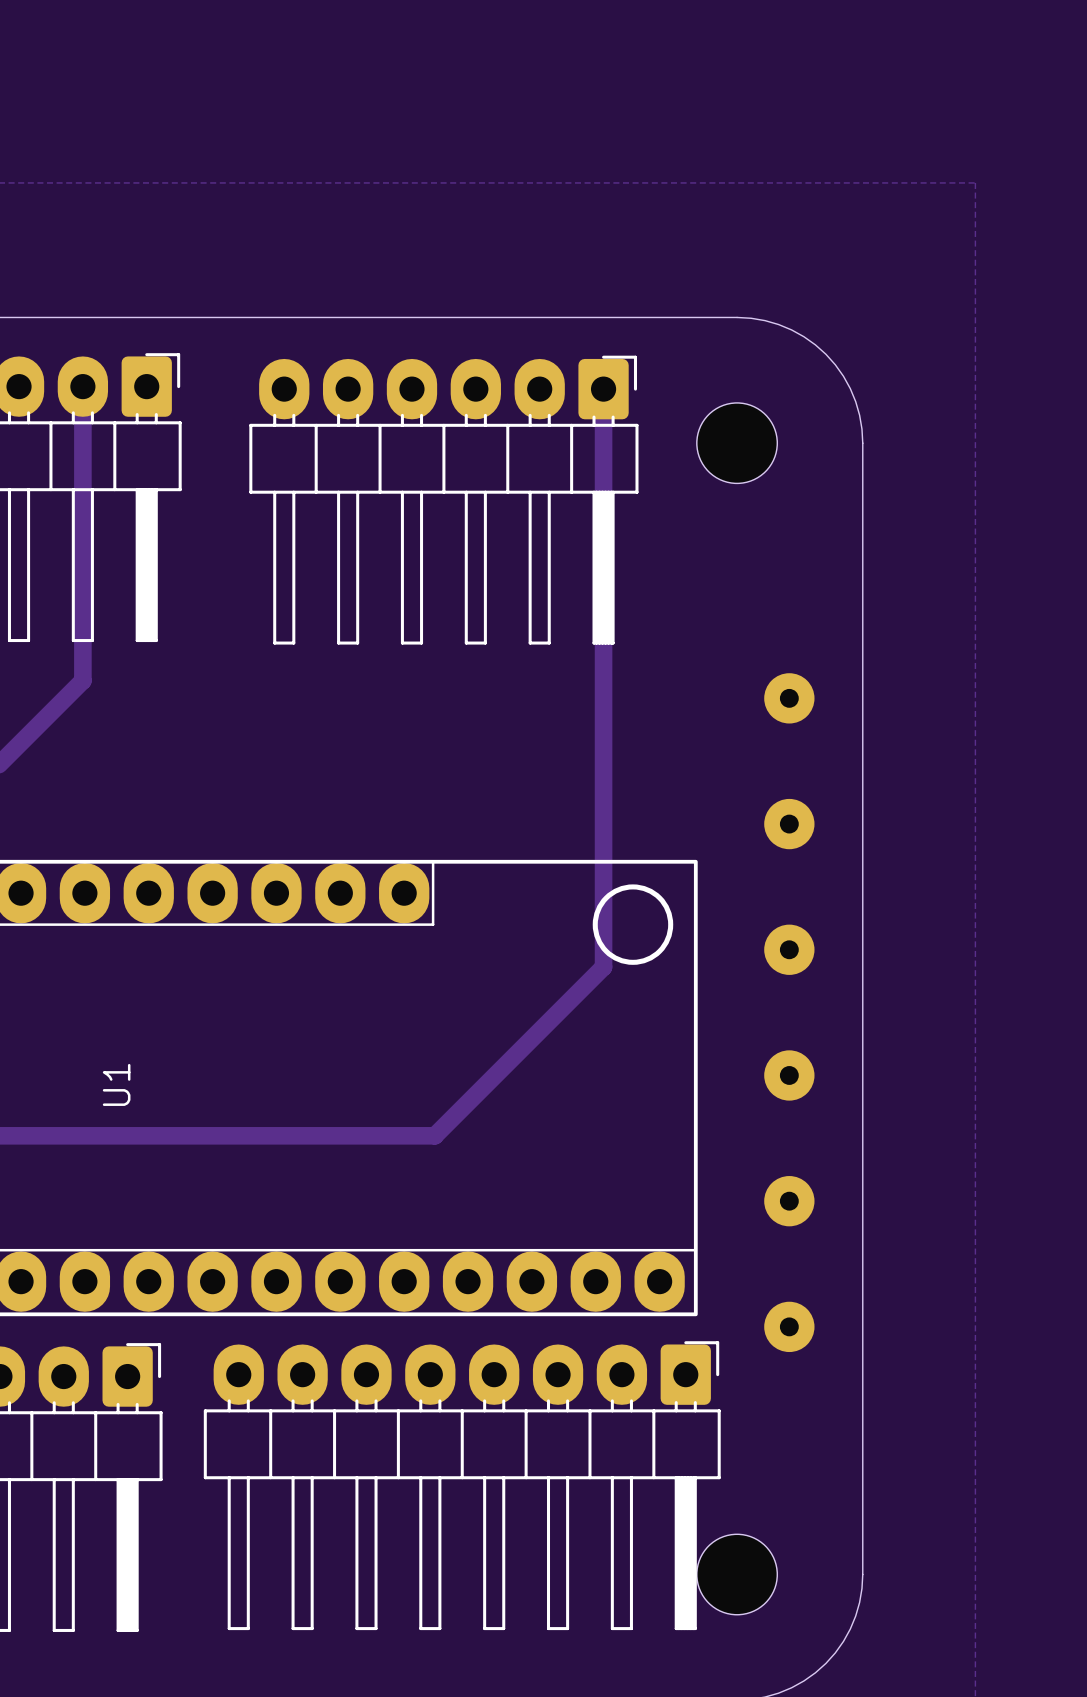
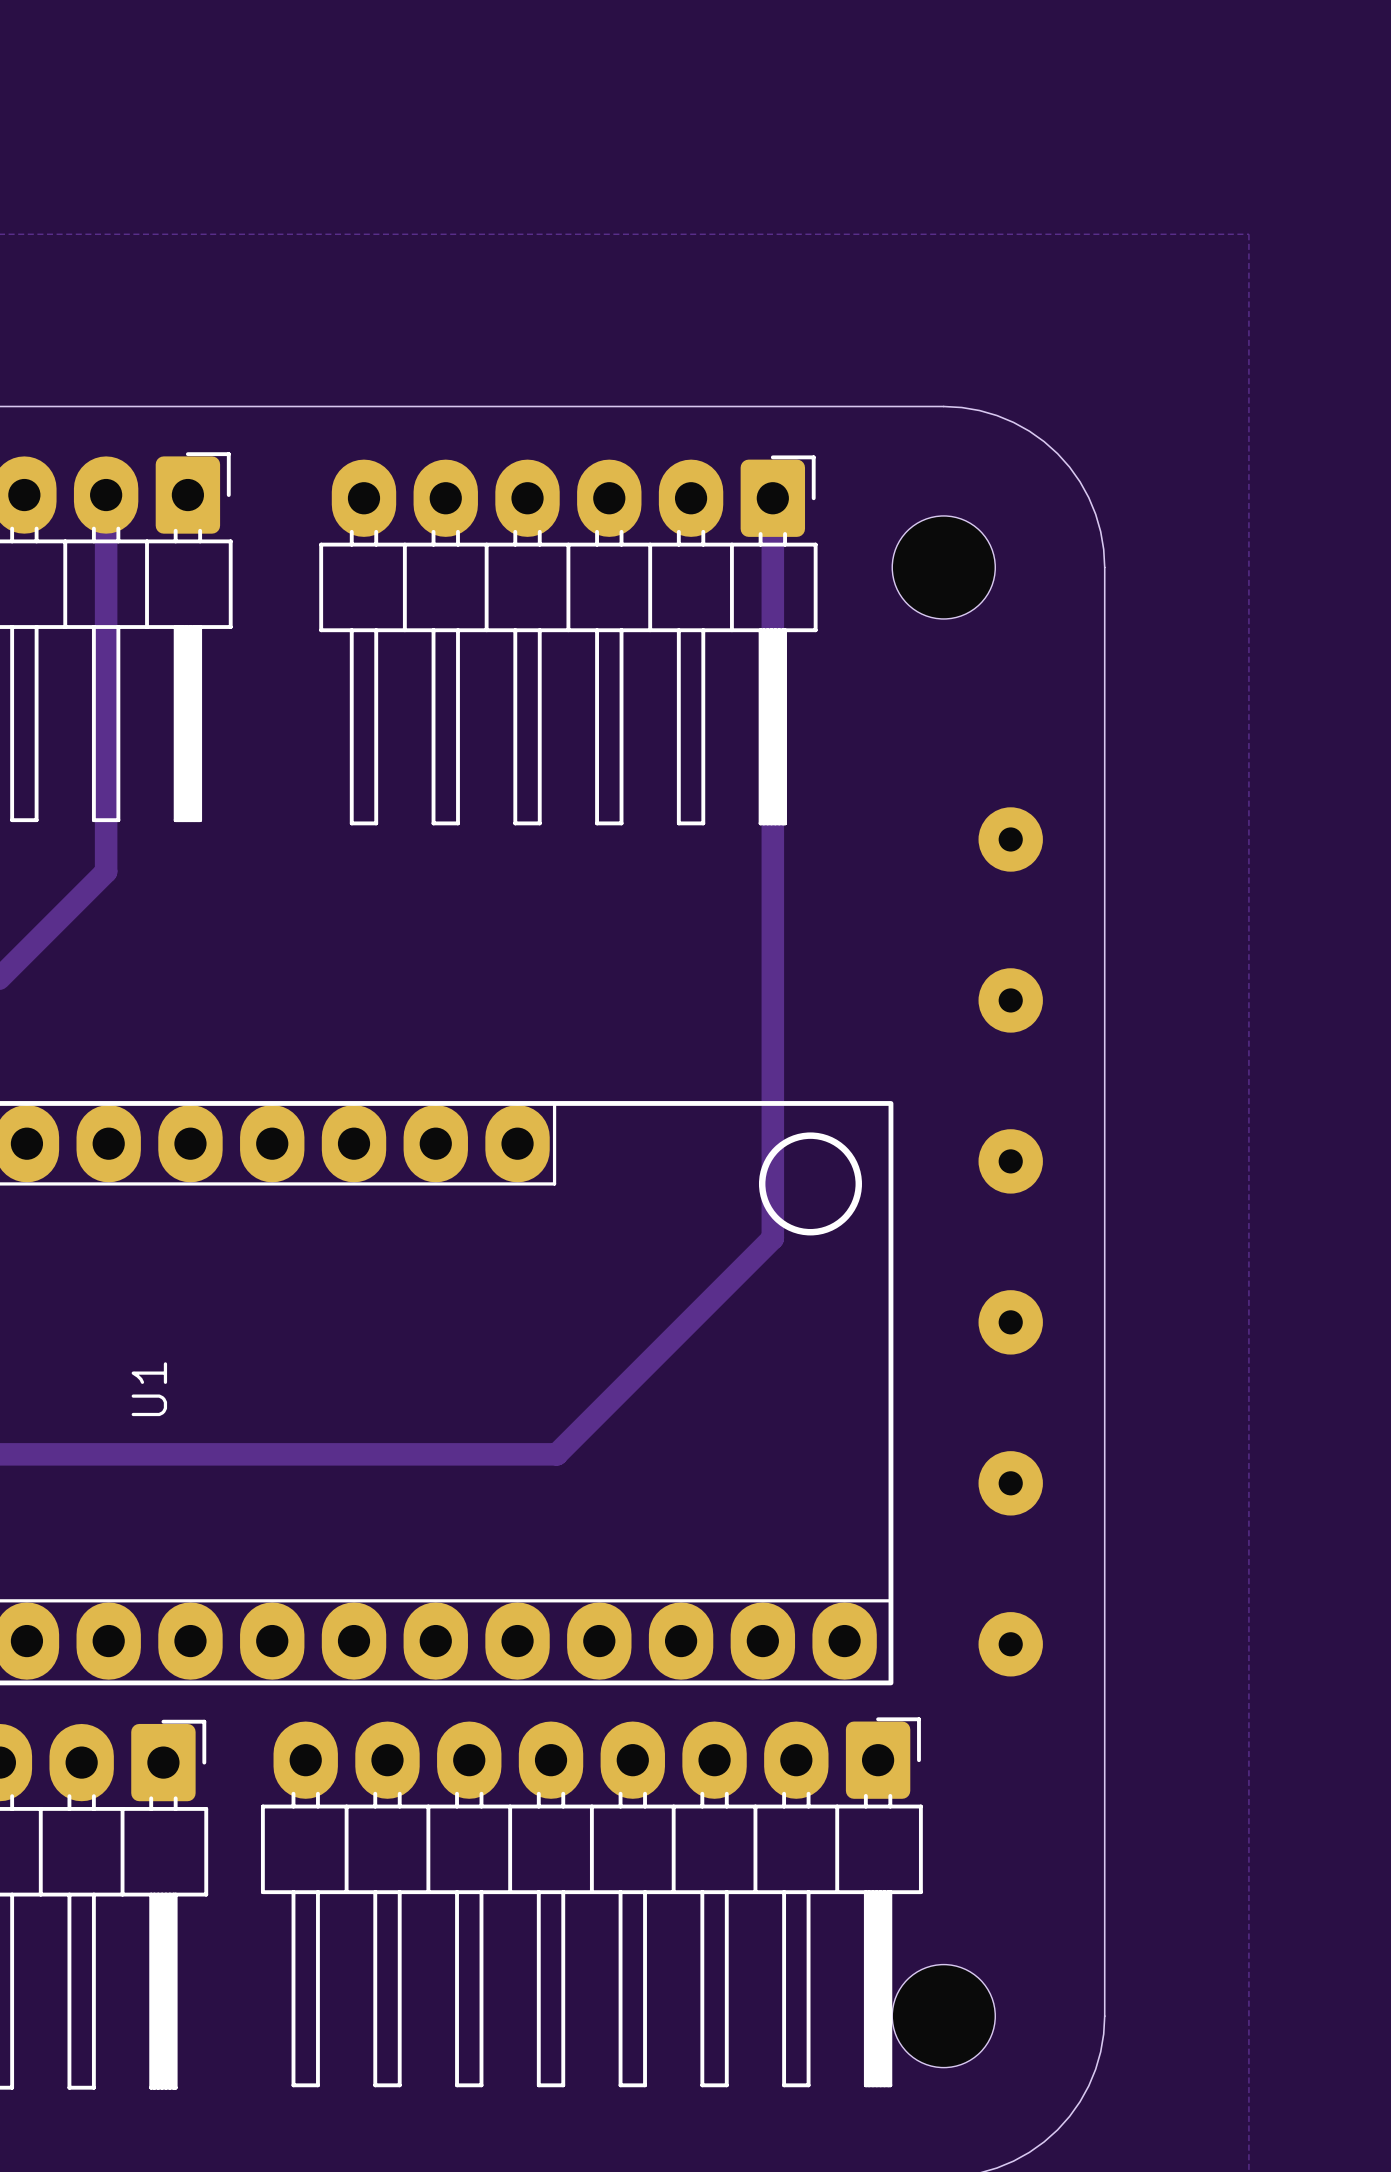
part: none -> (1010, 839)
part: (789, 698) -> none
part: none -> (1010, 1000)
part: (789, 824) -> none
part: none -> (1010, 1161)
part: (789, 949) -> none
part: none -> (1010, 1322)
part: (789, 1075) -> none
part: none -> (1010, 1483)
part: (789, 1201) -> none
part: none -> (1010, 1644)
part: (789, 1326) -> none

